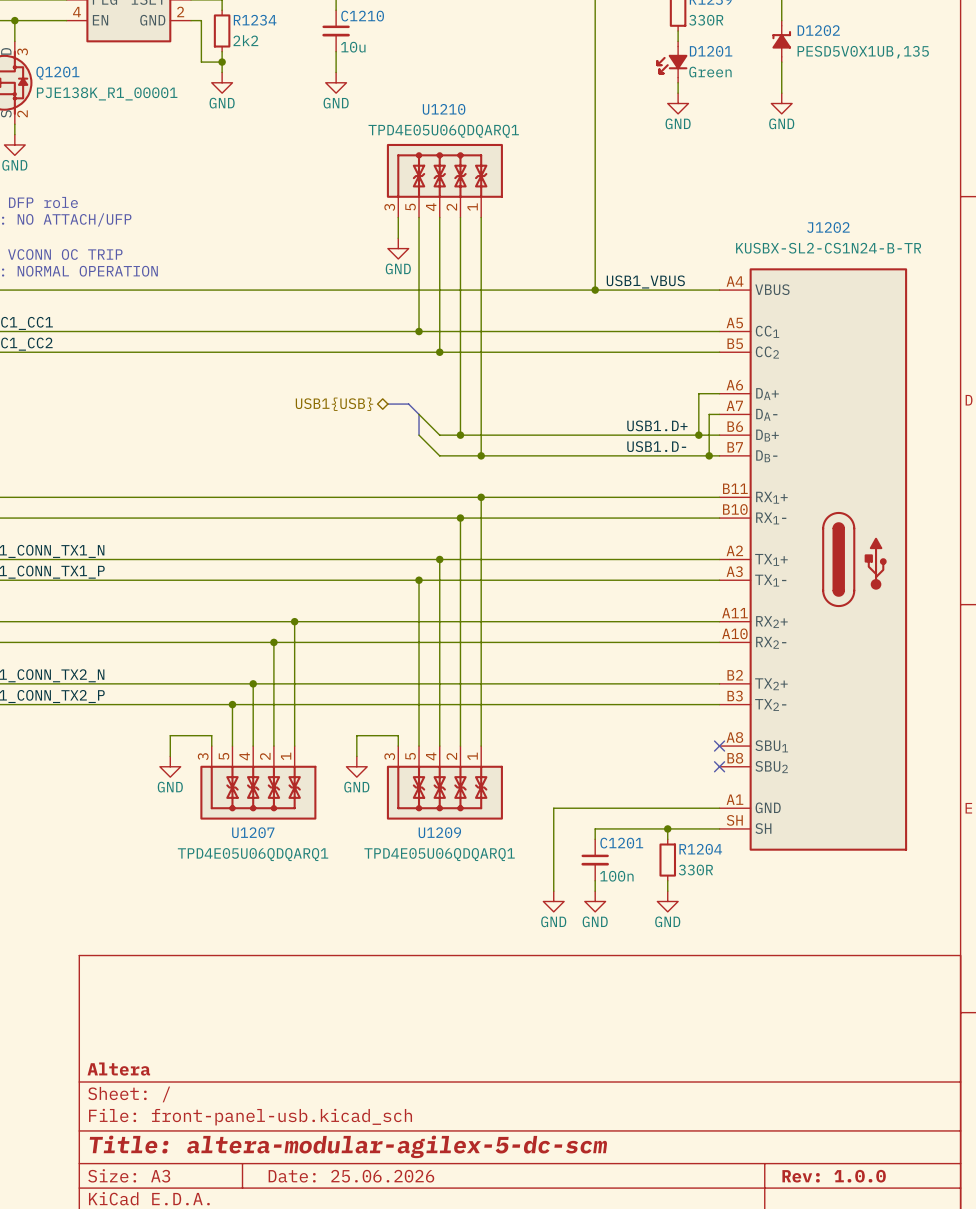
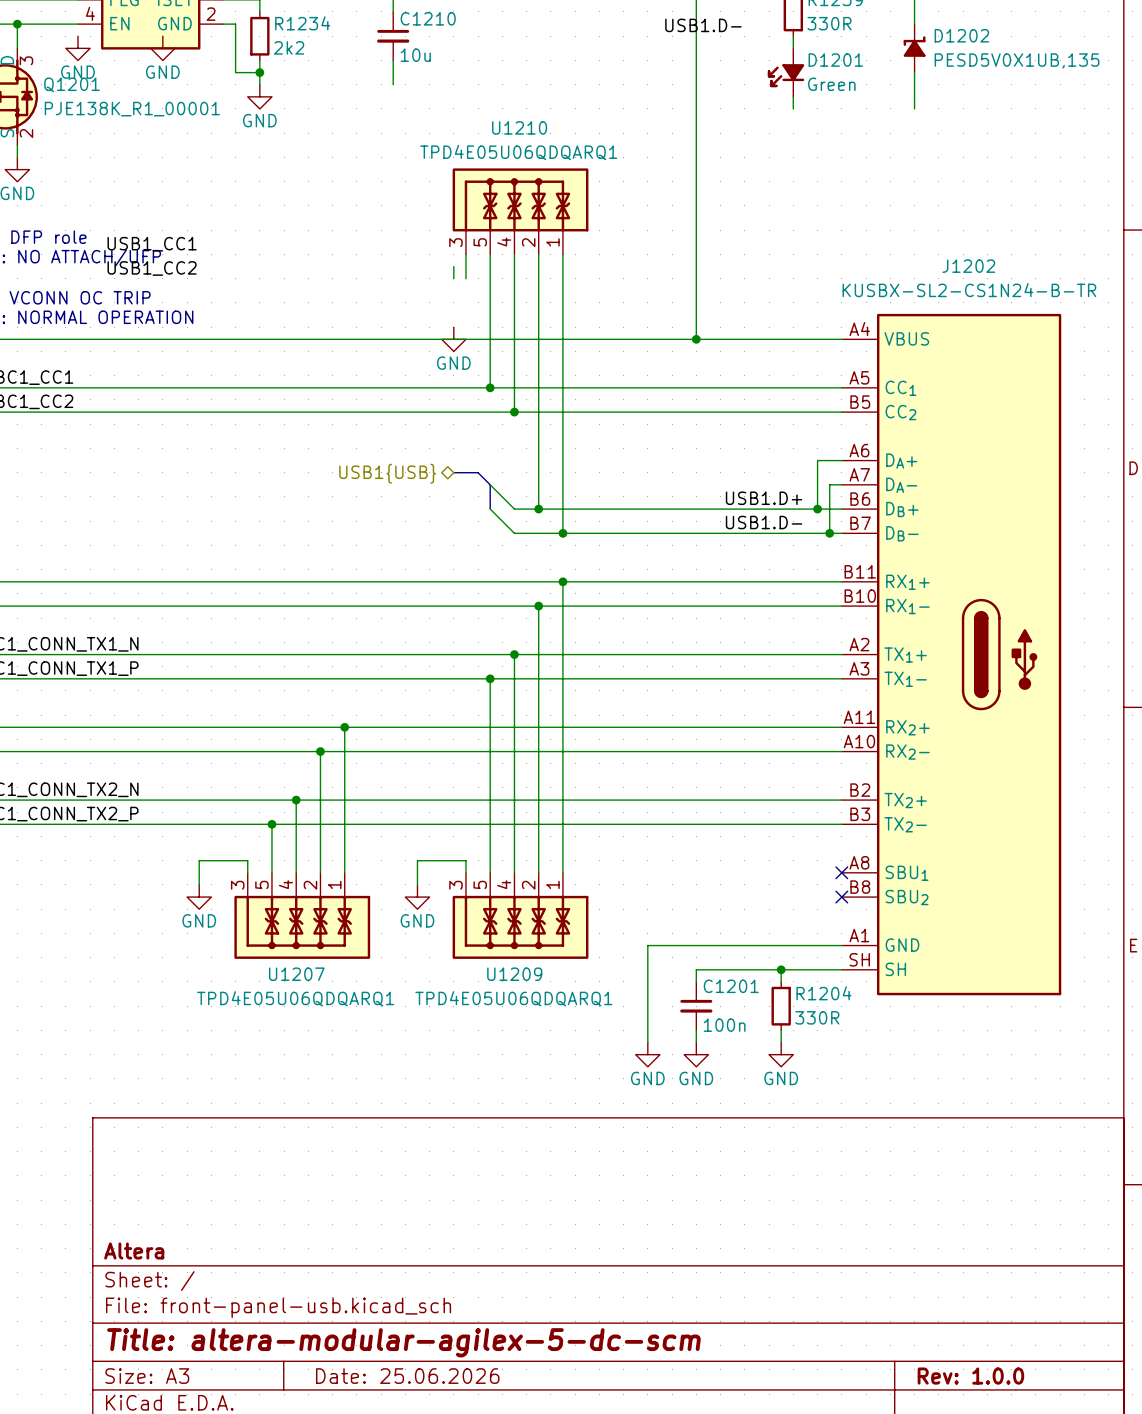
label: none -> USB1.D- (703, 25)
power symbol: none -> GND (77, 48)
power symbol: none -> GND (162, 48)
power symbol: GND (336, 82) -> none
power symbol: GND (678, 103) -> none
power symbol: GND (781, 103) -> none
label: none -> USB1_CC1 (152, 244)
wire: none -> (453, 266) (453, 278)
label: none -> USB1_CC2 (152, 268)
power symbol position: GND (398, 248) -> GND (453, 339)
label: USB1_VBUS (645, 281) -> none

